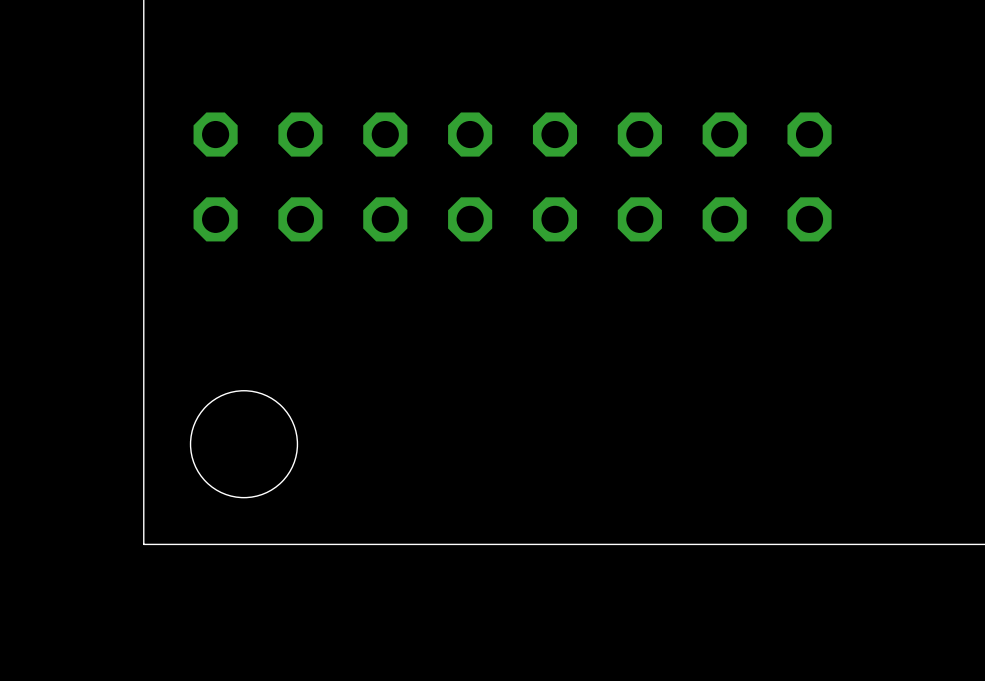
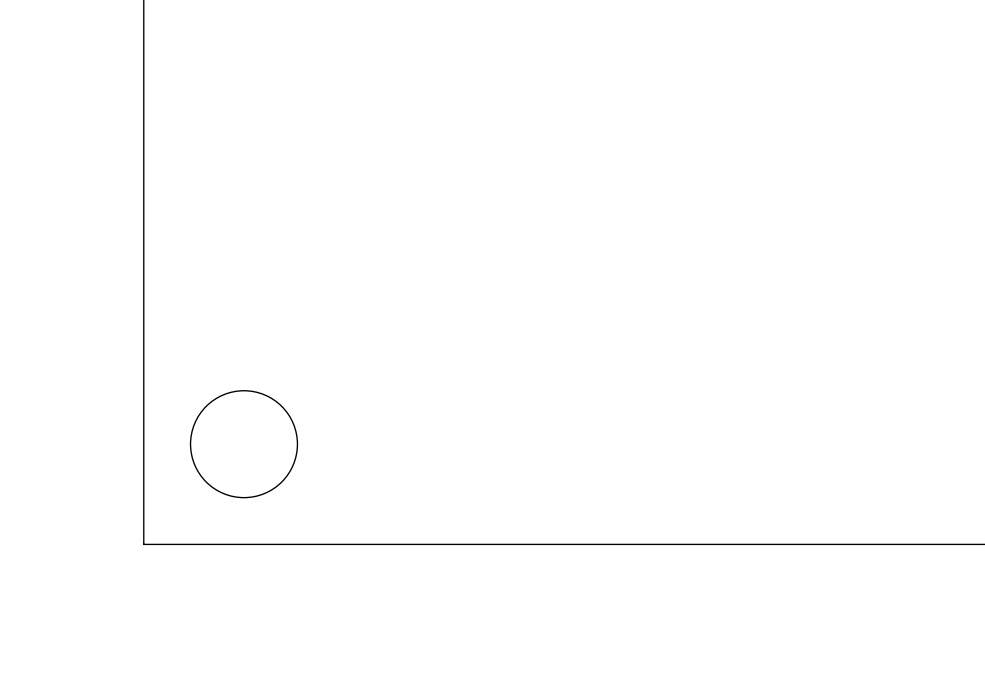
part: (342, 176) -> none
part: (682, 176) -> none

